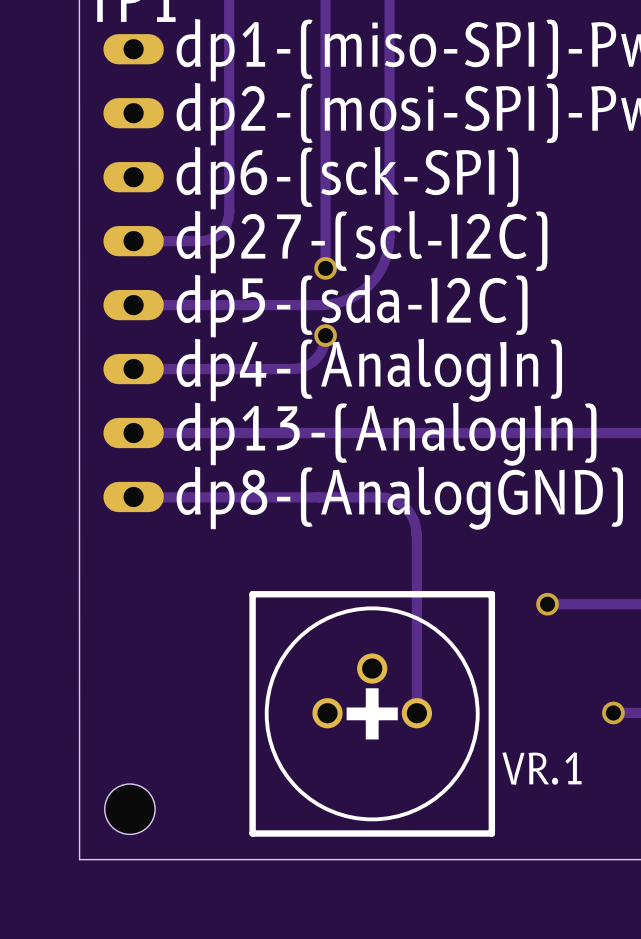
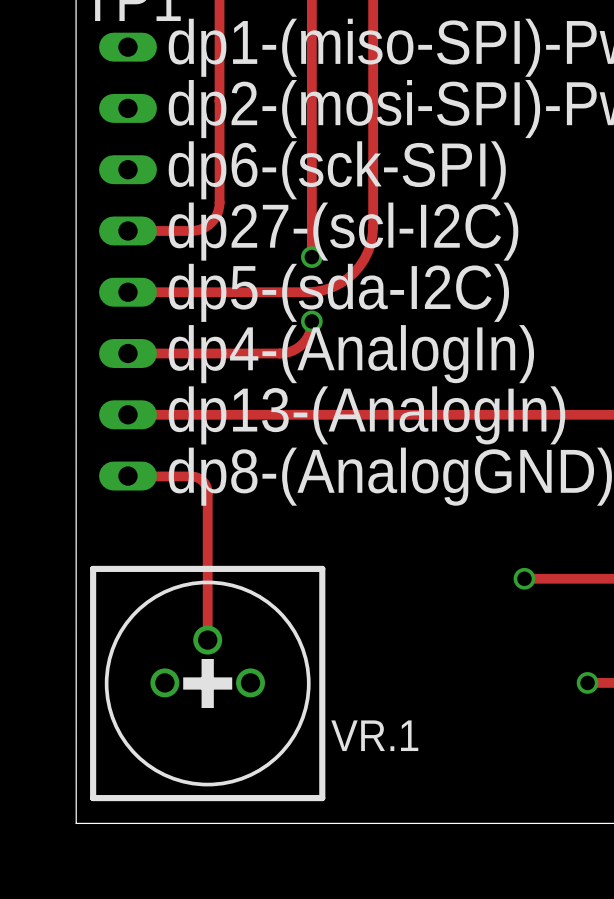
track: (199, 497) (379, 497) (393, 500) (405, 508) (413, 519) (416, 534) (416, 713) -> (191, 476) (202, 481) (207, 490) (207, 640)
VR.1 position: (372, 713) -> (207, 683)
hole: (129, 809) -> none

